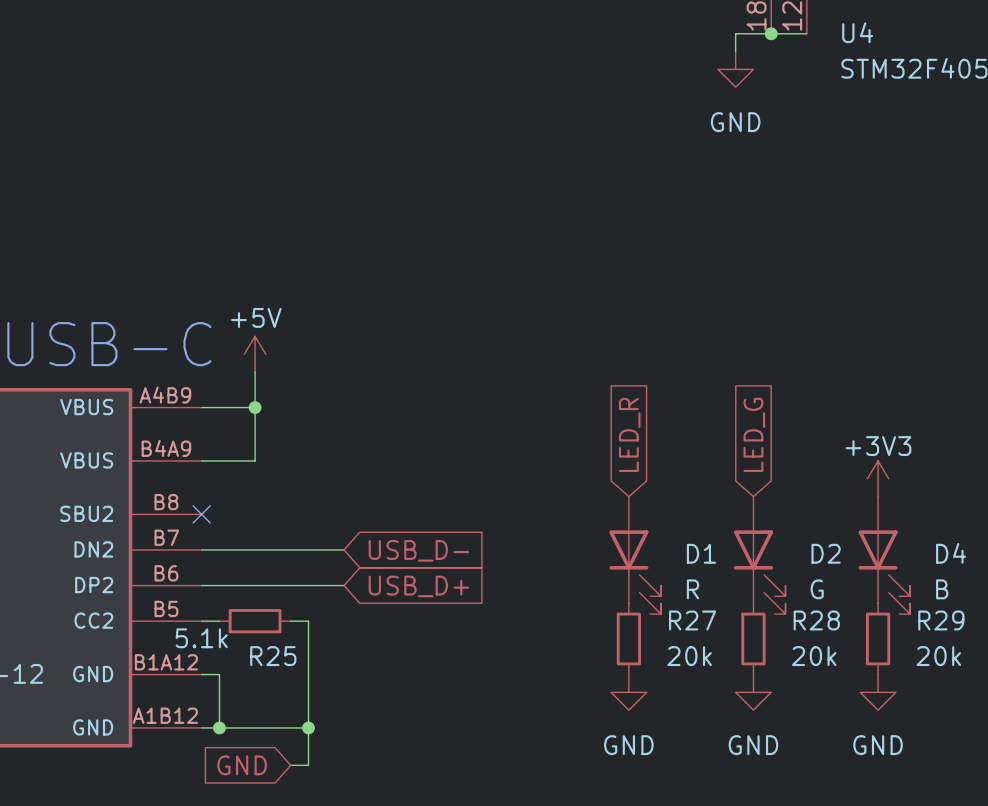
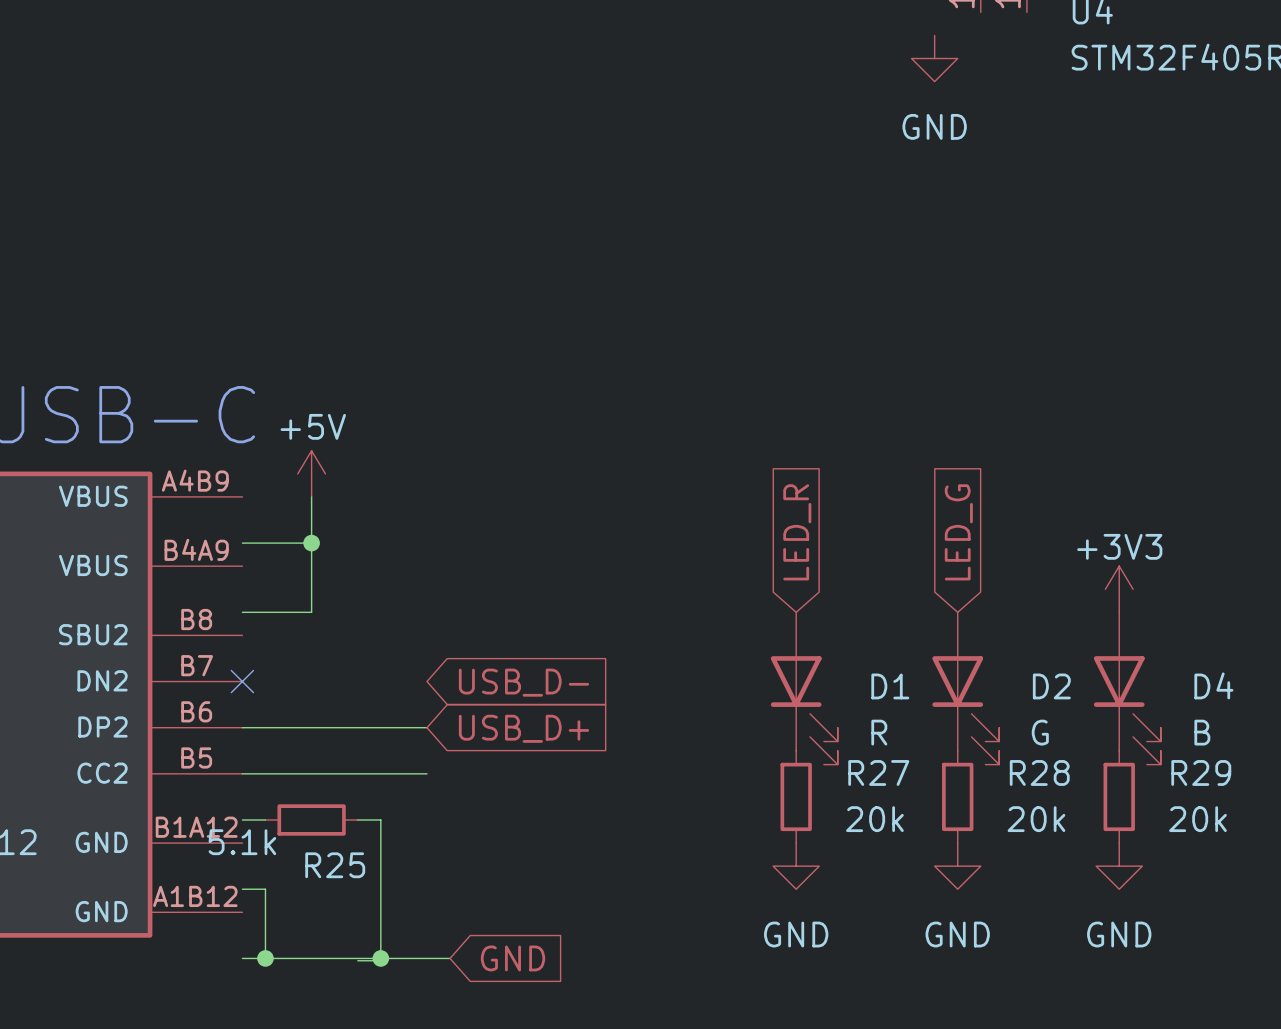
junction: (771, 33) -> none
wire: (806, 33) (735, 33) (735, 51) -> none
power symbol position: +5V (255, 354) -> +5V (311, 473)
wire: (255, 371) (255, 407) (201, 407) -> none
junction position: (255, 407) -> (311, 543)
wire: none -> (242, 543) (311, 543)
wire: (201, 460) (255, 460) -> (242, 612) (311, 612) (311, 566)
no-connect mark position: (201, 514) -> (242, 681)
wire: (201, 549) (344, 549) -> none
wire: none -> (265, 773) (357, 773)
R25 position: (255, 621) -> (311, 819)
wire: (308, 621) (308, 656) -> (357, 819) (380, 819)
wire: none -> (380, 773) (426, 773)
wire: none -> (242, 819) (265, 819)
wire: (201, 674) (219, 674) (219, 710) -> (242, 889) (265, 889)
wire: (201, 727) (308, 727) -> none
wire: none -> (265, 912) (265, 958)
junction position: (219, 727) -> (265, 958)
junction position: (308, 727) -> (380, 958)
wire: none -> (242, 958) (450, 958)
global label rotation: 0° (242, 765) -> 180° (513, 958)
global label position: GND (242, 765) -> GND (513, 958)

